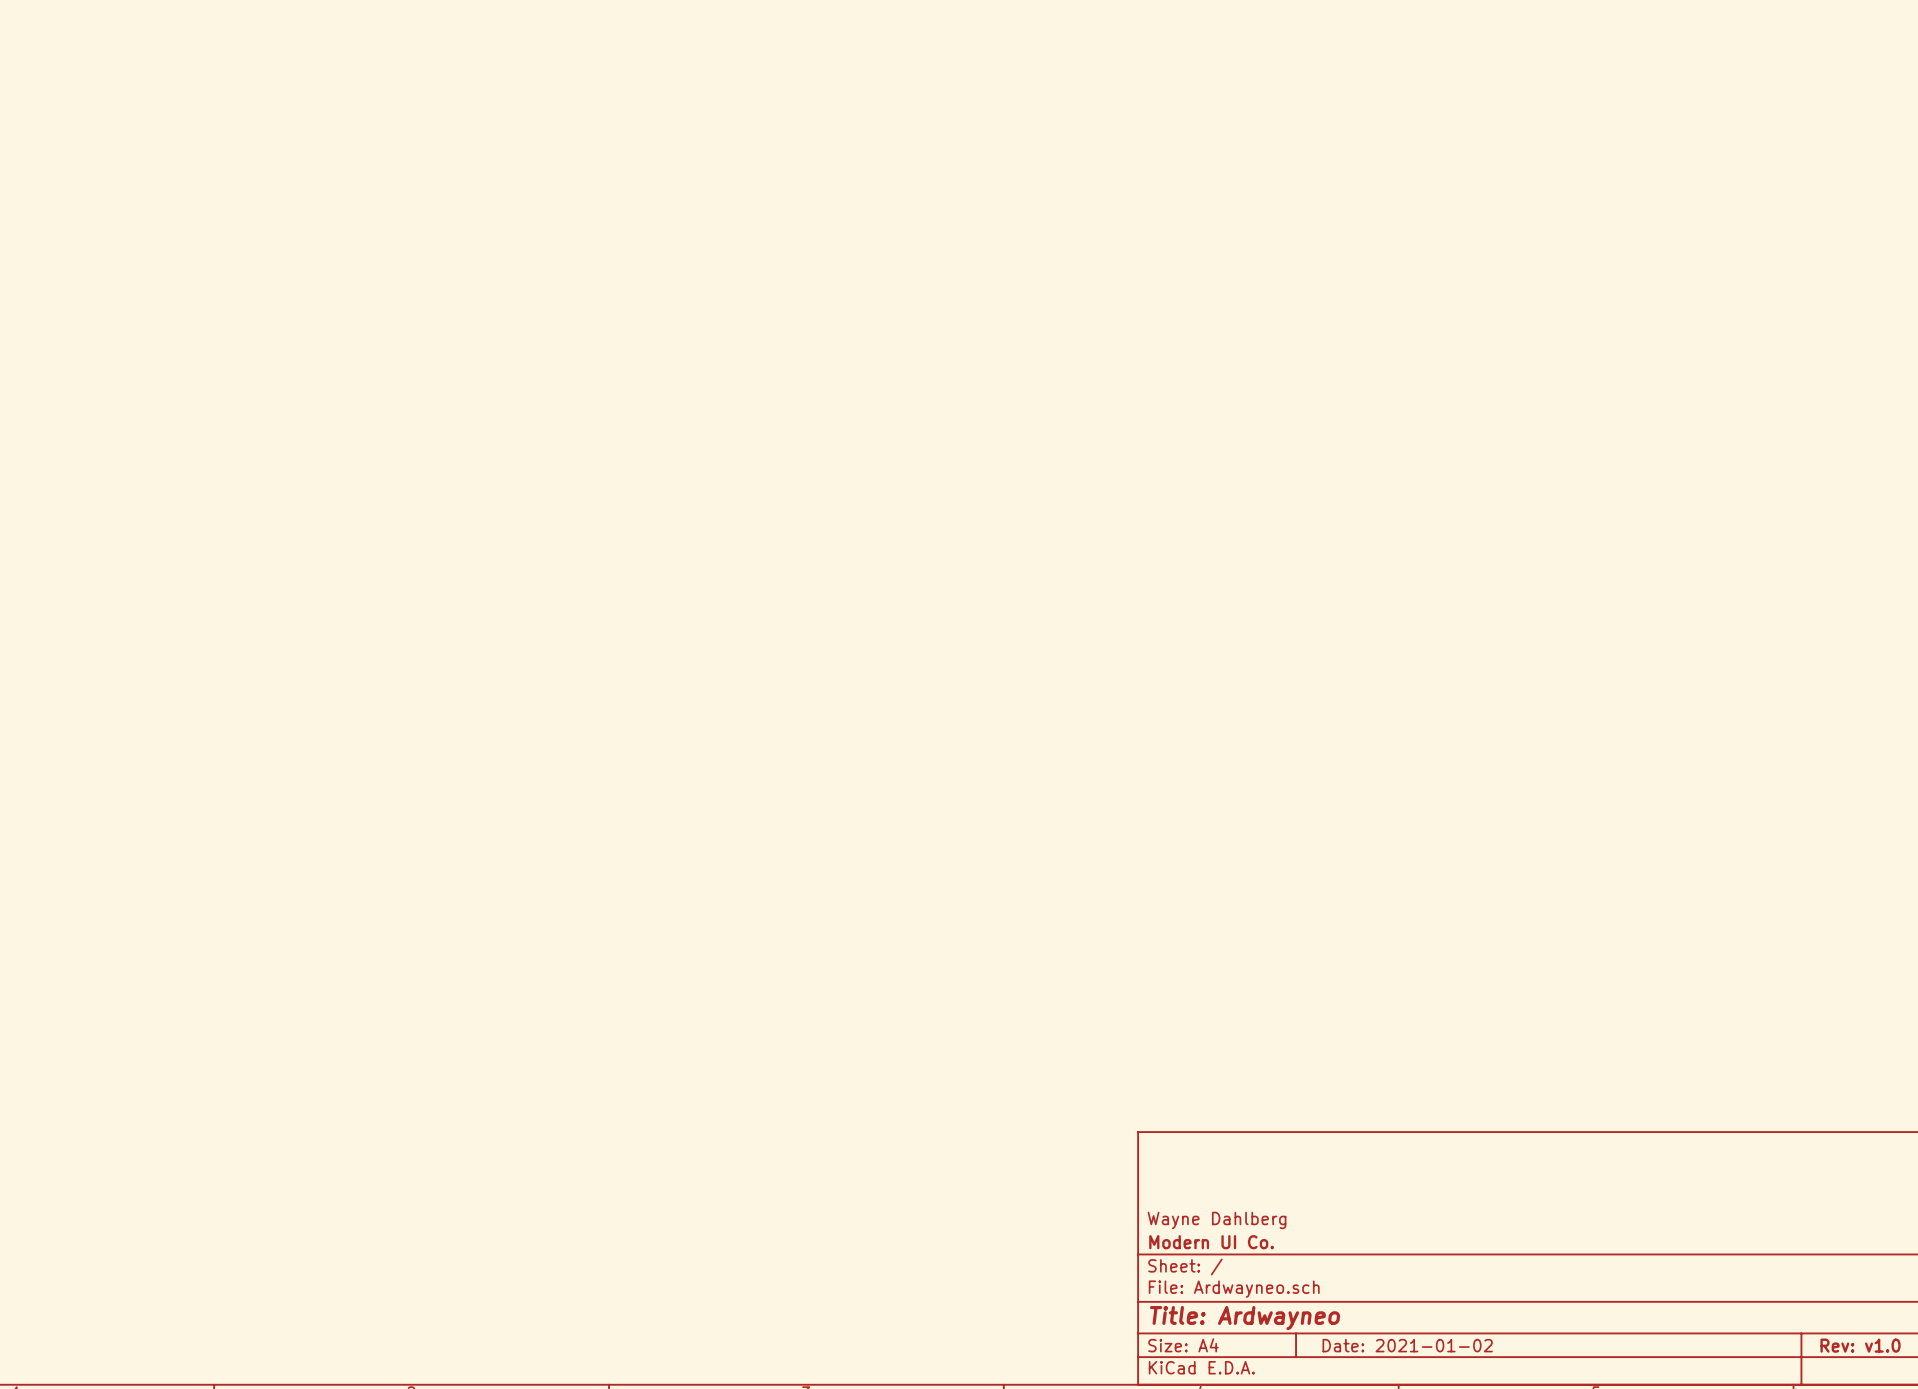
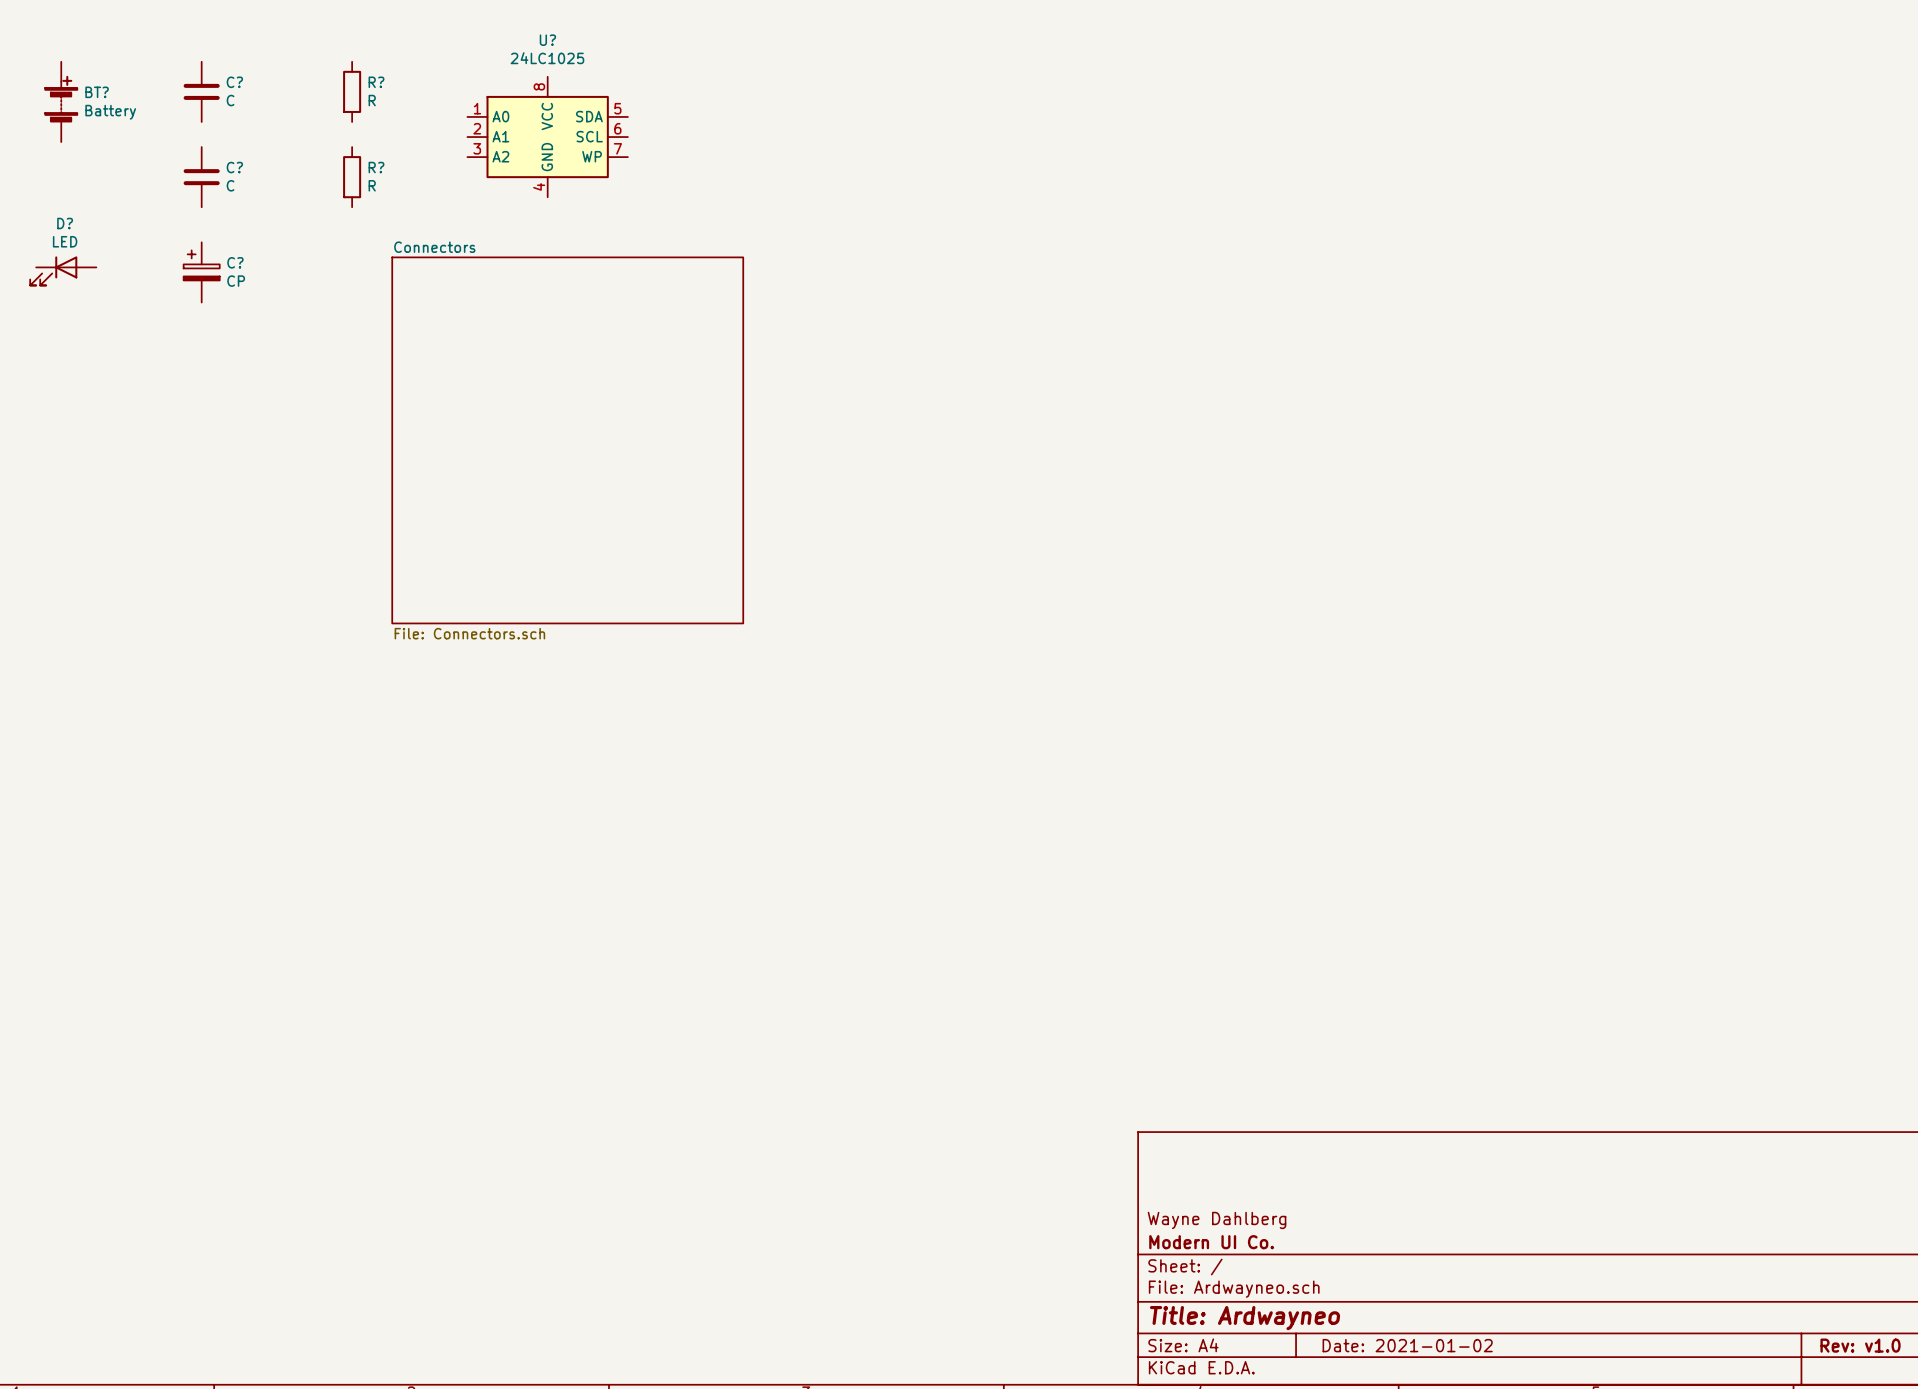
C?: none -> C (201, 91)
R?: none -> R (352, 91)
BT?: none -> Battery (61, 101)
U?: none -> 24LC1025 (547, 137)
C?: none -> C (201, 177)
R?: none -> R (352, 177)
D?: none -> LED (63, 270)
C?: none -> CP (201, 272)
sheet Connectors: none -> File: Connectors.sch (567, 440)

